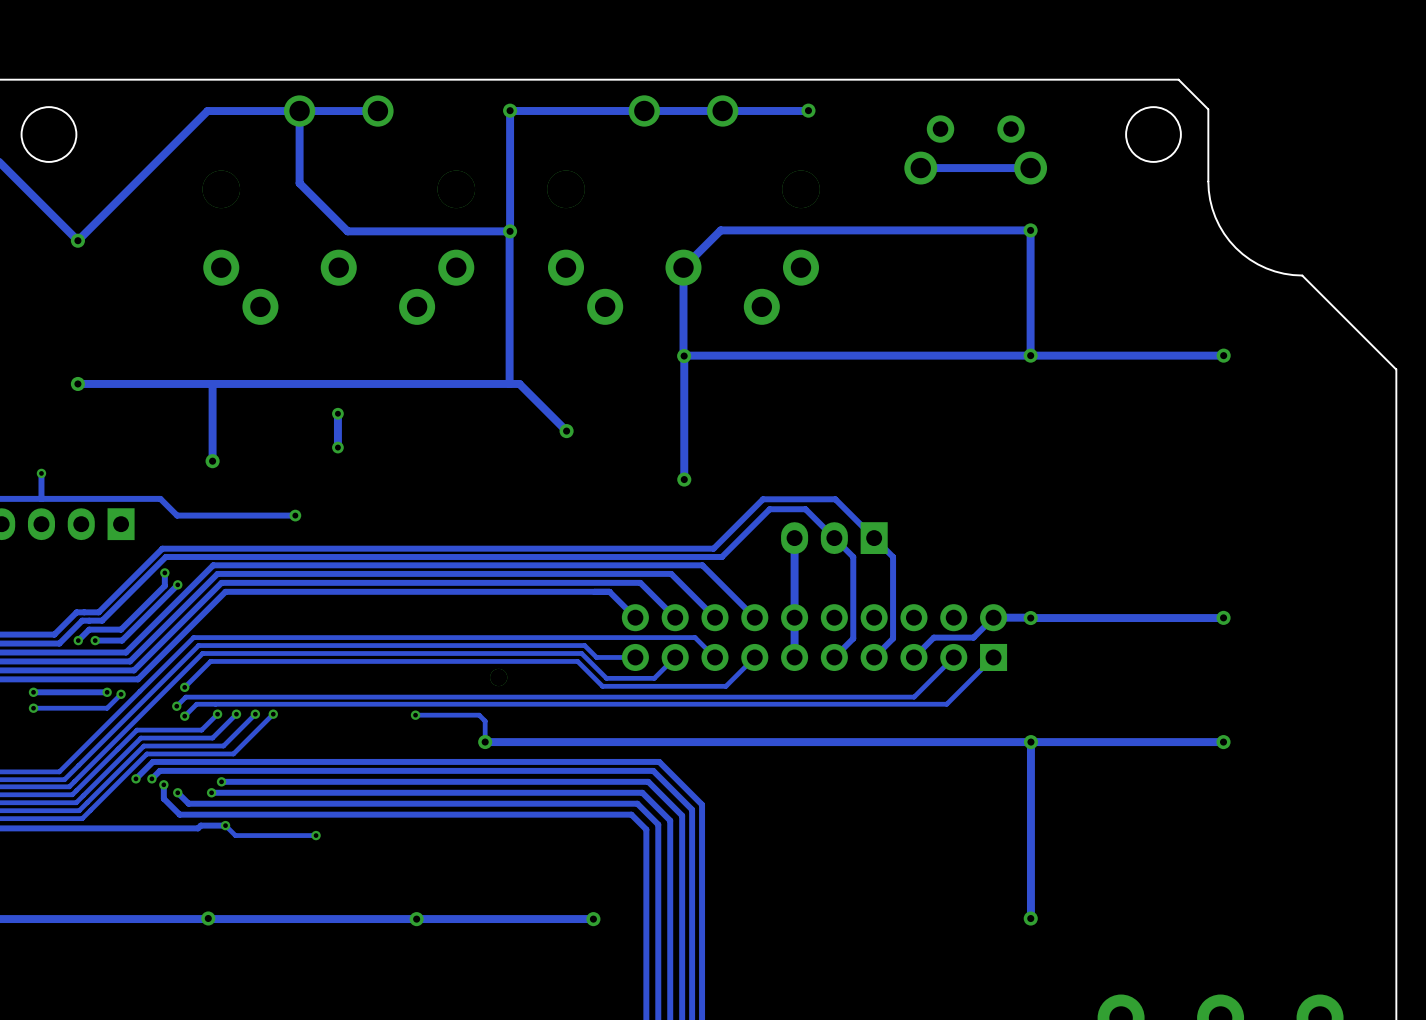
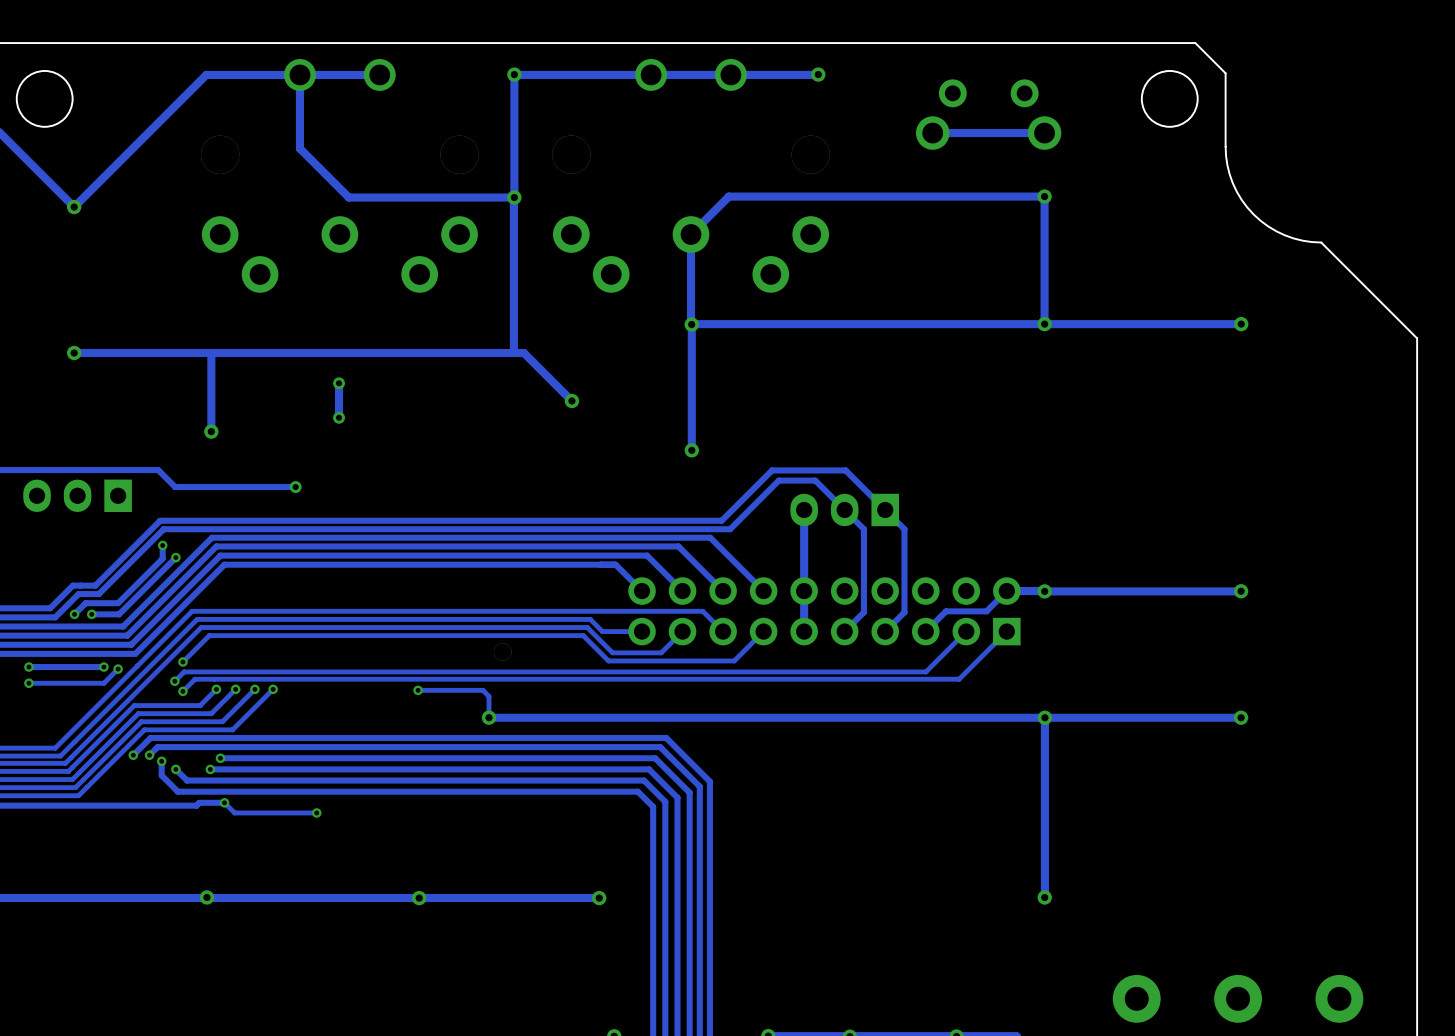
track: (41, 473) (41, 498) -> none
via: (41, 473) -> none

